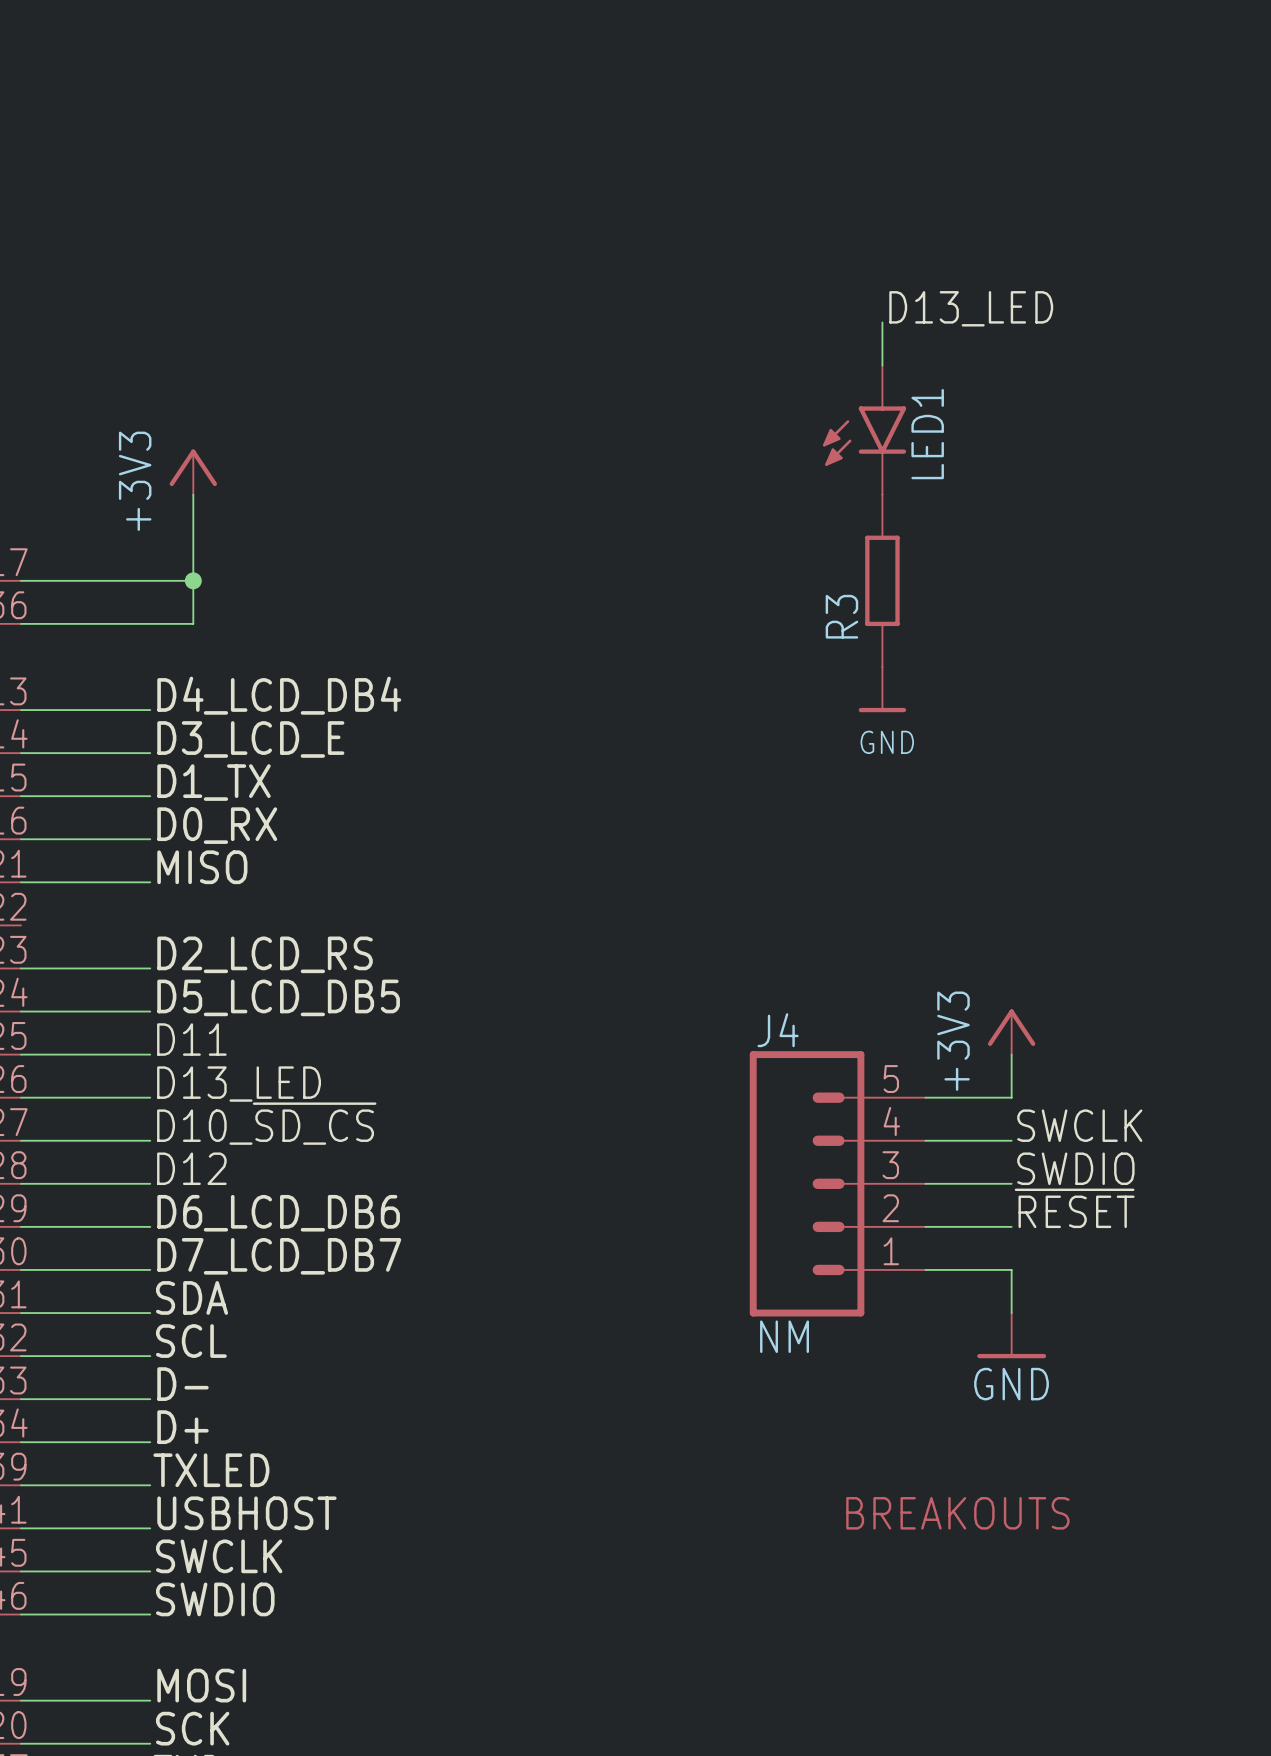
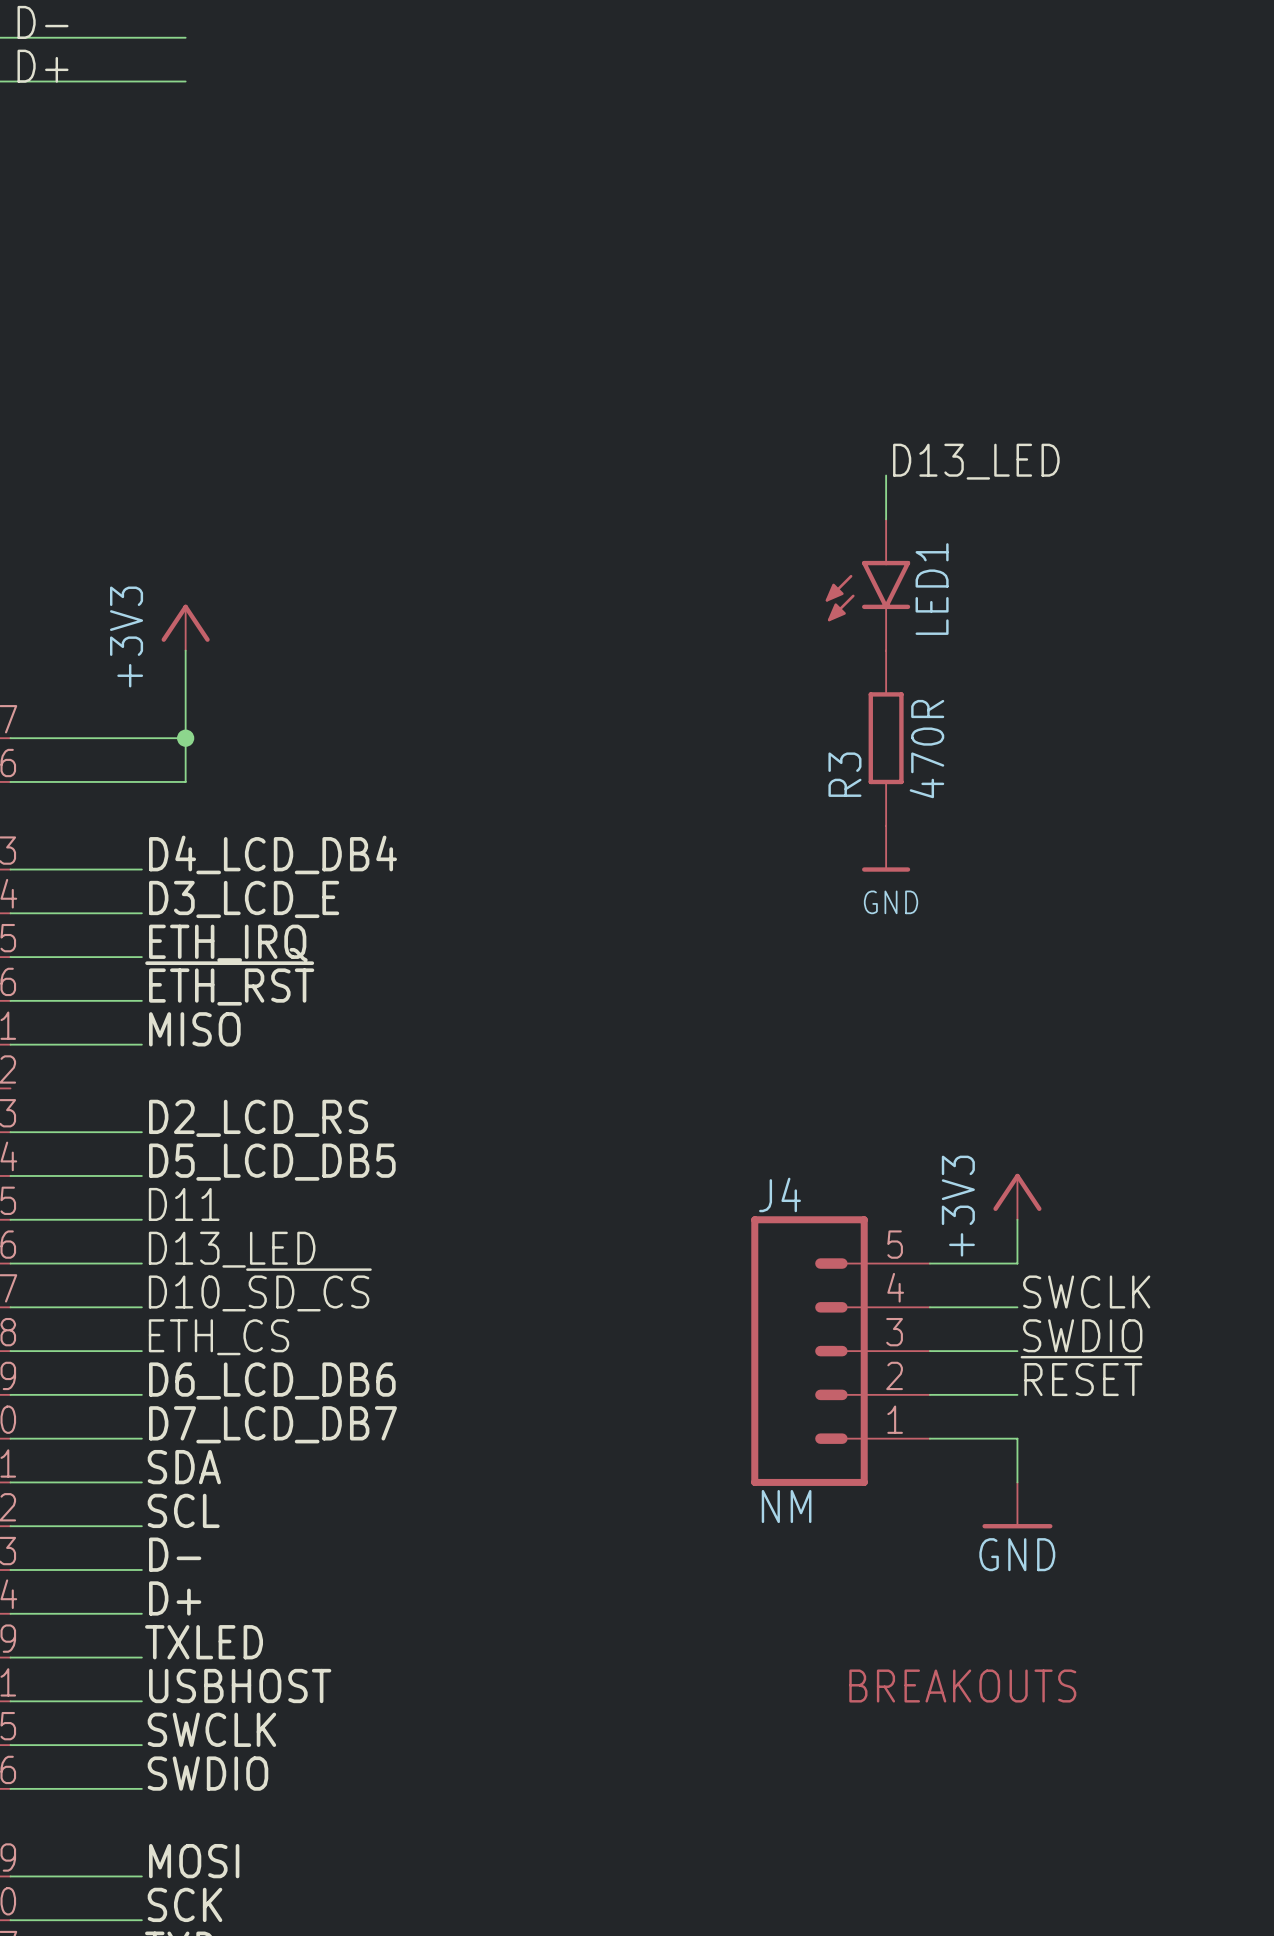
R3 value: none -> 470R (926, 749)
label: D1_TX (214, 782) -> ETH_IRQ (228, 943)
label: D0_RX (217, 825) -> ~{ETH_RST} (229, 983)
label: D12 (191, 1168) -> ETH_CS (218, 1337)

